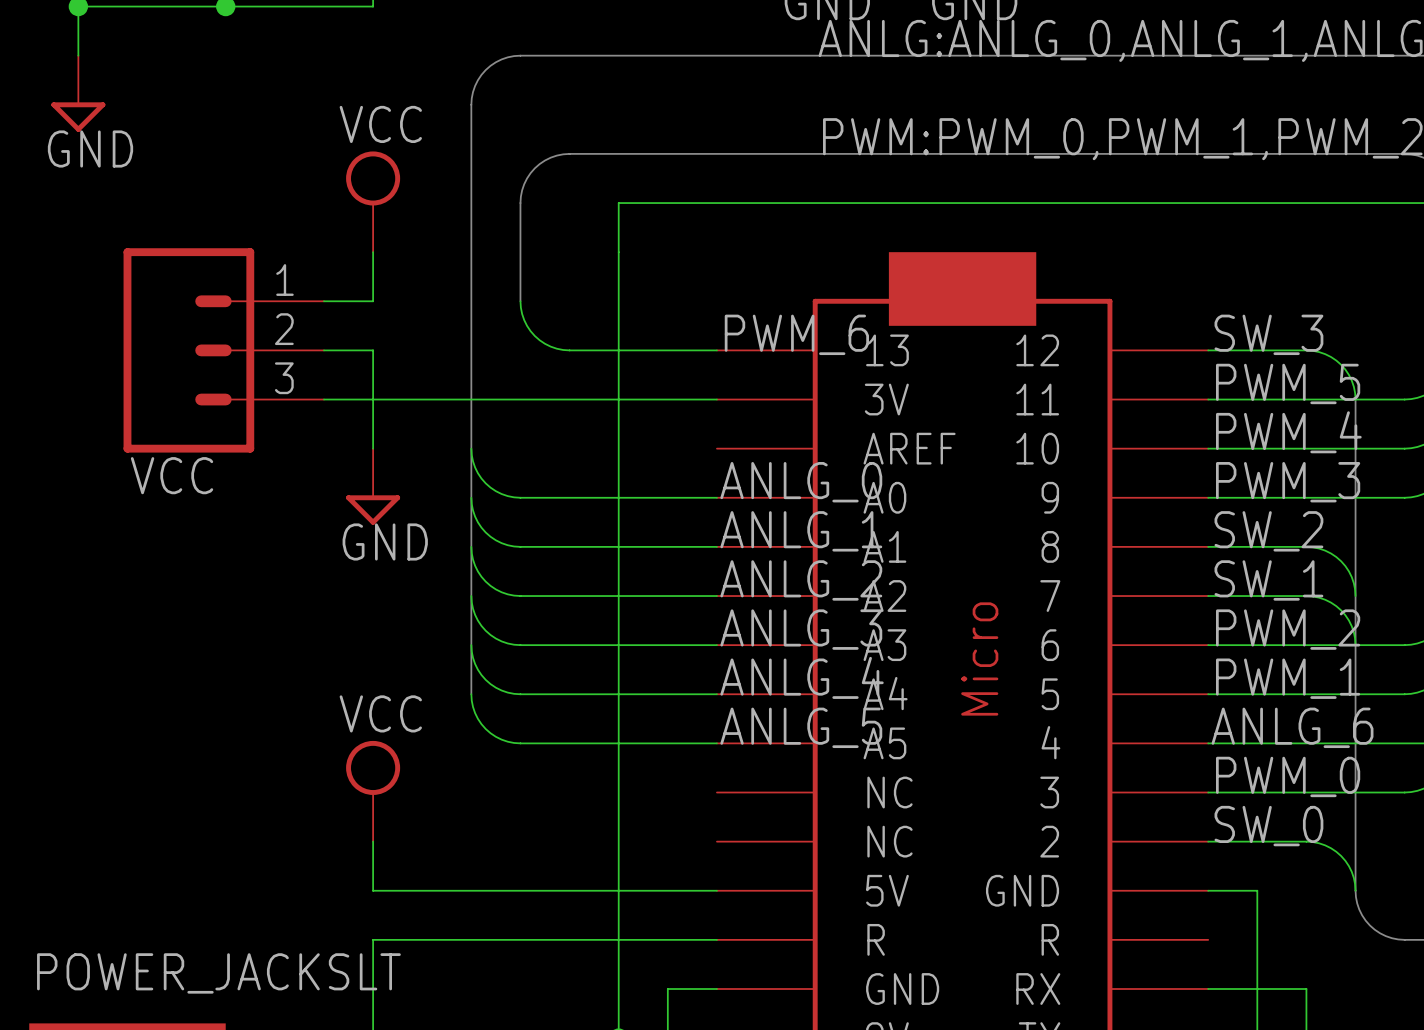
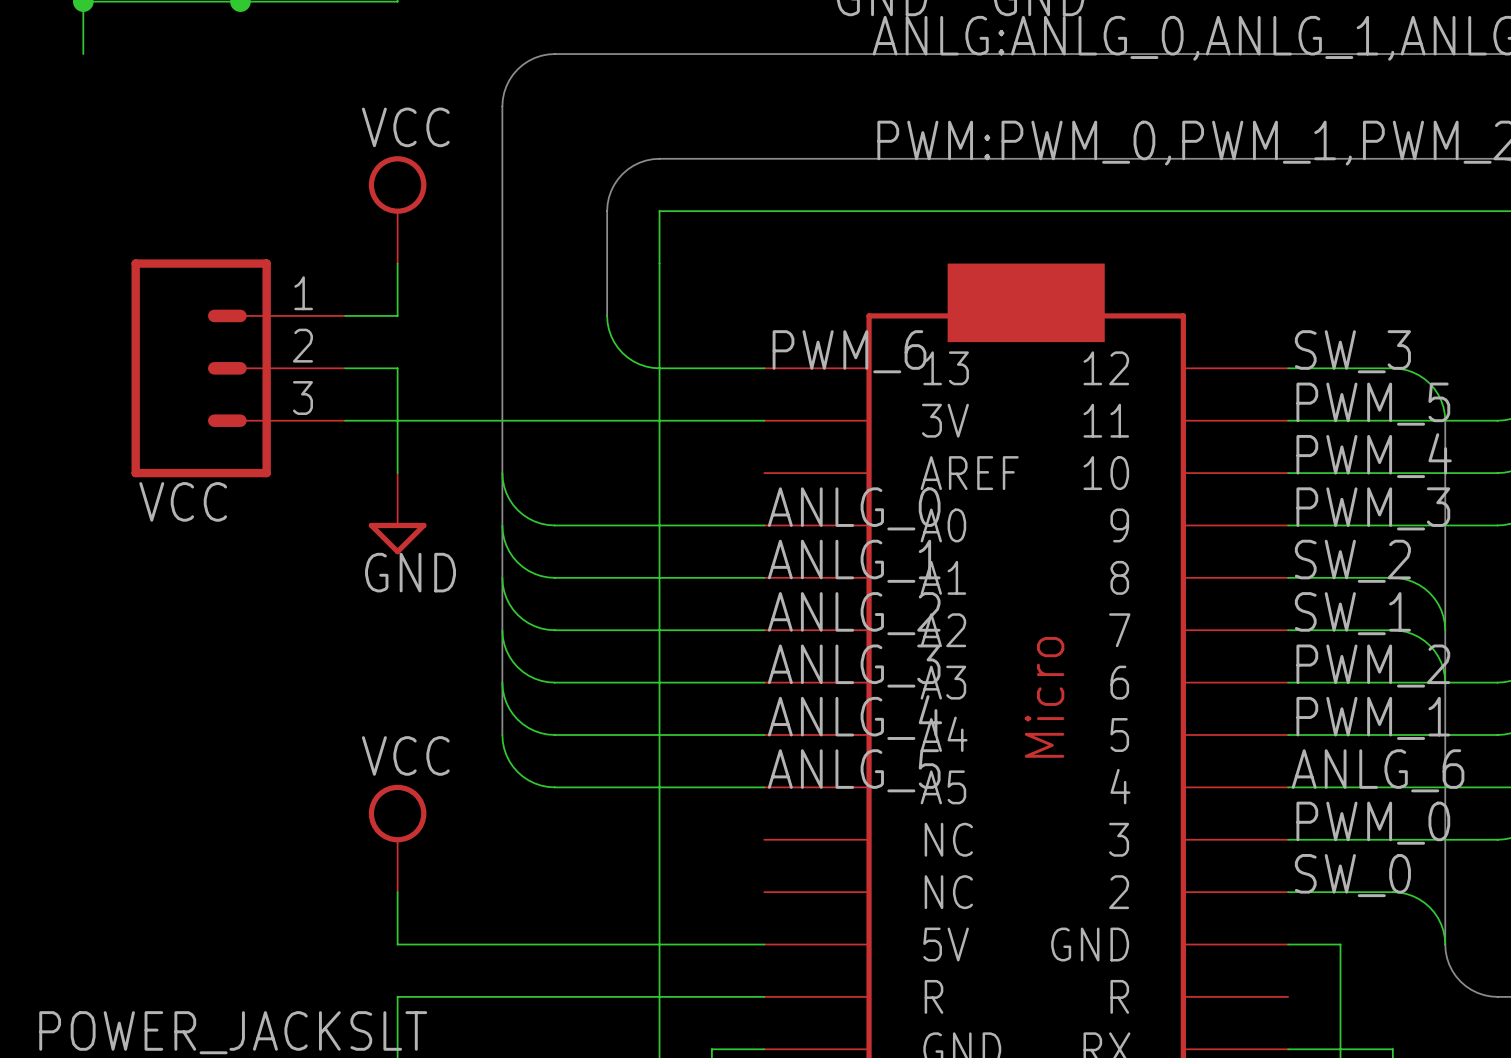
power symbol: GND (78, 93) -> none
bus: (618, 153) (556, 155) (539, 164) (527, 178) (522, 190) (520, 203) (520, 301) -> (659, 158) (645, 160) (627, 169) (617, 179) (608, 197) (607, 211) (607, 315)
wire: (520, 301) (522, 313) (527, 325) (534, 336) (545, 343) (563, 349) (618, 350) -> (607, 315) (611, 335) (622, 352) (639, 364) (659, 368)

